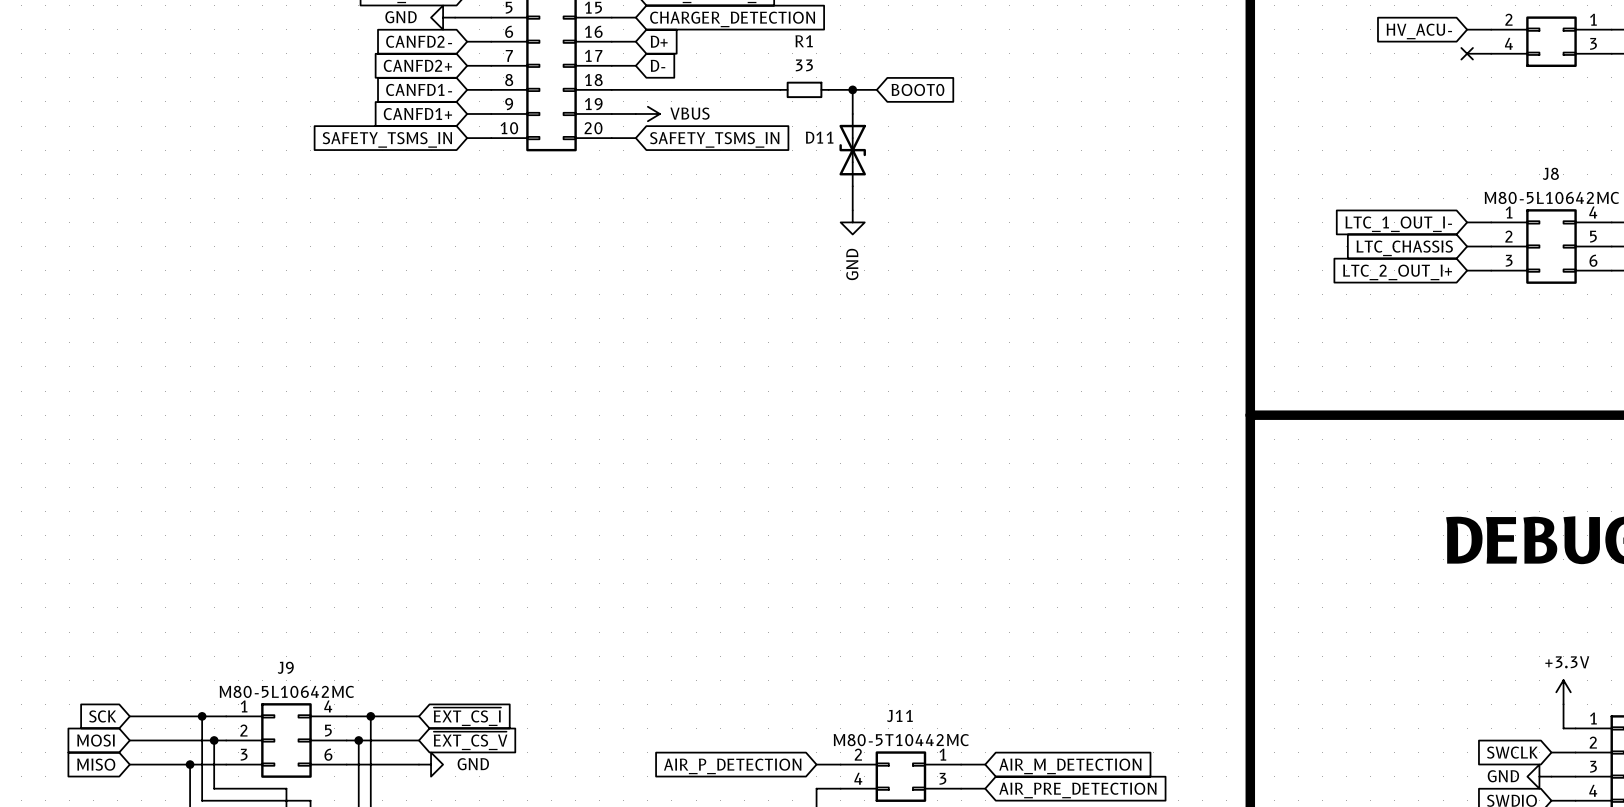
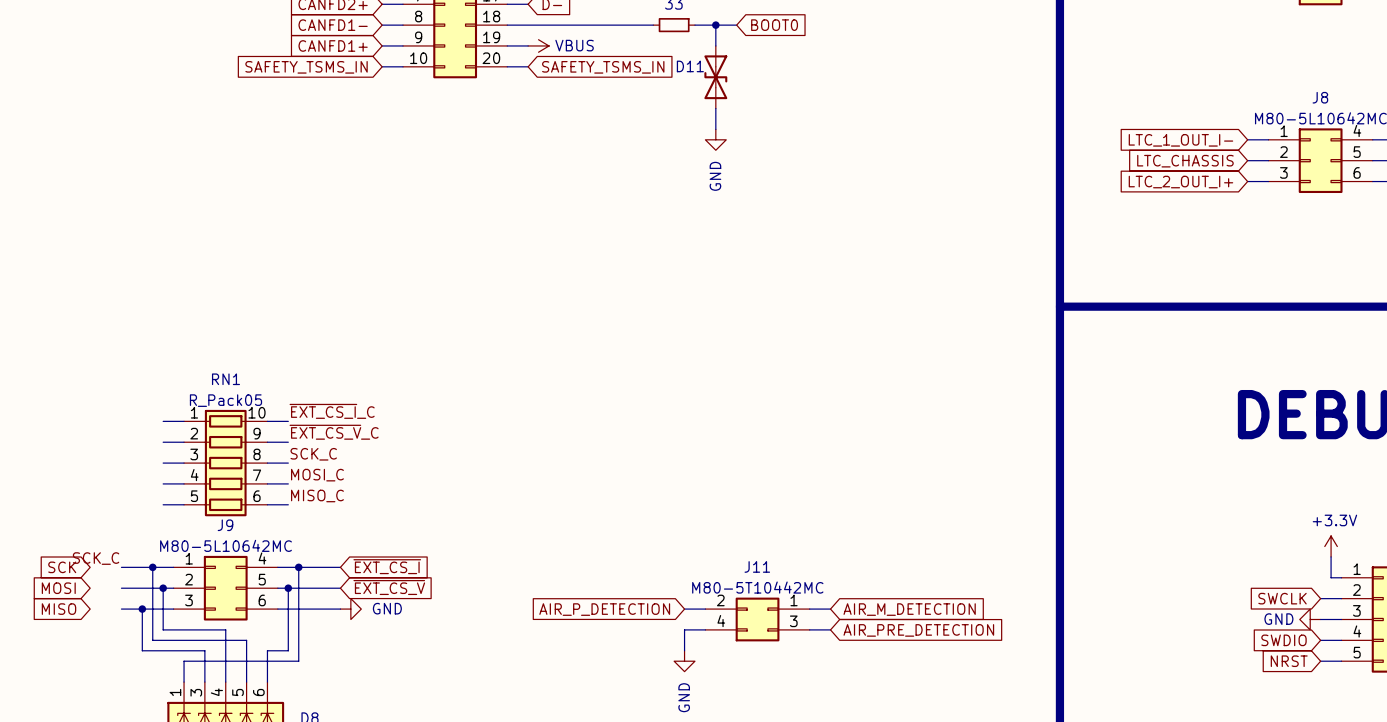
label: none -> ~{EXT_CS_I}_C (332, 411)
wire: none -> (163, 421) (184, 421)
wire: none -> (267, 421) (288, 421)
label: none -> ~{EXT_CS_V}_C (334, 432)
wire: none -> (163, 442) (184, 442)
wire: none -> (267, 442) (288, 442)
label: none -> SCK_C (313, 454)
wire: none -> (163, 463) (184, 463)
RN1: none -> R_Pack05 (225, 463)
wire: none -> (267, 463) (288, 463)
label: none -> MOSI_C (317, 475)
wire: none -> (163, 483) (184, 483)
wire: none -> (267, 483) (288, 483)
label: none -> MISO_C (317, 495)
wire: none -> (163, 504) (184, 504)
wire: none -> (267, 504) (288, 504)
label: none -> SCK_C (96, 558)
wire: (129, 716) (165, 716) -> none
wire: (129, 740) (165, 740) -> none
wire: (129, 764) (165, 764) -> none

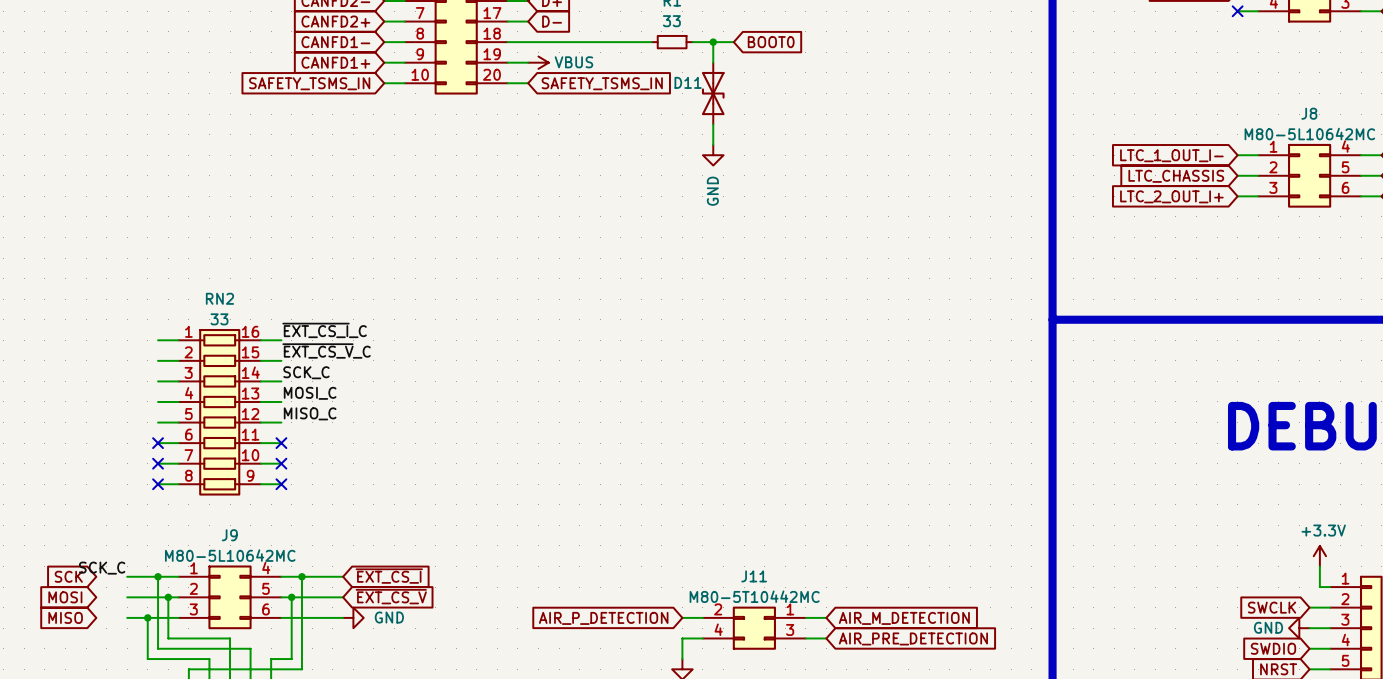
wire: none -> (158, 340) (178, 340)
wire: none -> (260, 340) (281, 340)
wire: none -> (158, 360) (178, 360)
wire: none -> (260, 360) (281, 360)
wire: none -> (158, 381) (178, 381)
wire: none -> (260, 381) (281, 381)
RN2: none -> 33 (219, 412)
label position: ~{EXT_CS_I}_C (332, 411) -> ~{EXT_CS_I}_C (324, 330)
wire: (163, 421) (184, 421) -> (158, 401) (178, 401)
wire: (267, 421) (288, 421) -> (260, 401) (281, 401)
no-connect mark: none -> (158, 443)
no-connect mark: none -> (281, 443)
label position: ~{EXT_CS_V}_C (334, 432) -> ~{EXT_CS_V}_C (326, 350)
wire: (163, 442) (184, 442) -> (158, 422) (178, 422)
wire: (267, 442) (288, 442) -> (260, 422) (281, 422)
no-connect mark: none -> (158, 463)
no-connect mark: none -> (281, 463)
label position: SCK_C (313, 454) -> SCK_C (306, 372)
wire: (163, 463) (184, 463) -> (158, 443) (178, 443)
RN1: R_Pack05 (225, 463) -> none
wire: (267, 463) (288, 463) -> (260, 443) (281, 443)
no-connect mark: none -> (158, 484)
no-connect mark: none -> (281, 484)
label position: MOSI_C (317, 475) -> MOSI_C (310, 393)
wire: (163, 483) (184, 483) -> (158, 463) (178, 463)
wire: (267, 483) (288, 483) -> (260, 463) (281, 463)
label position: MISO_C (317, 495) -> MISO_C (310, 413)
wire: (163, 504) (184, 504) -> (158, 484) (178, 484)
wire: (267, 504) (288, 504) -> (260, 484) (281, 484)

